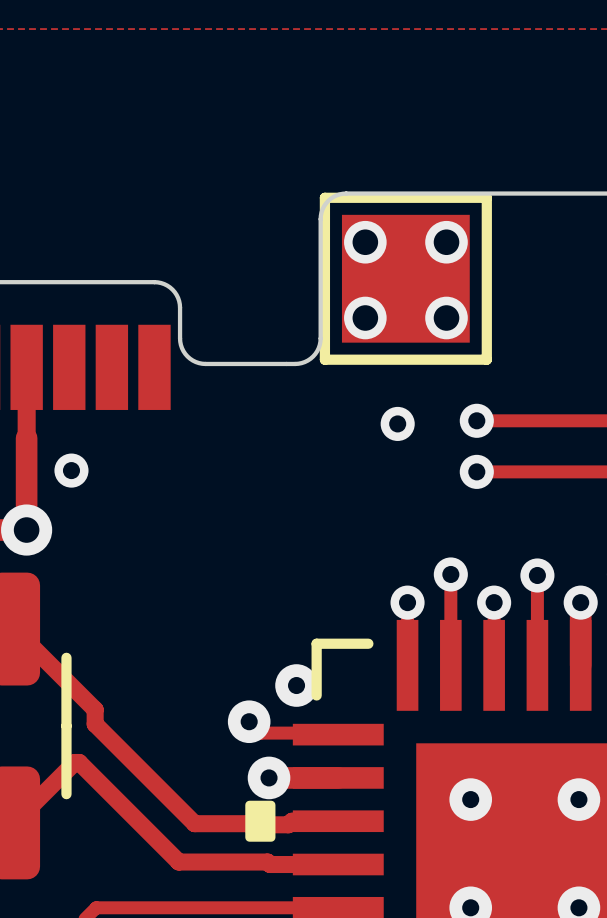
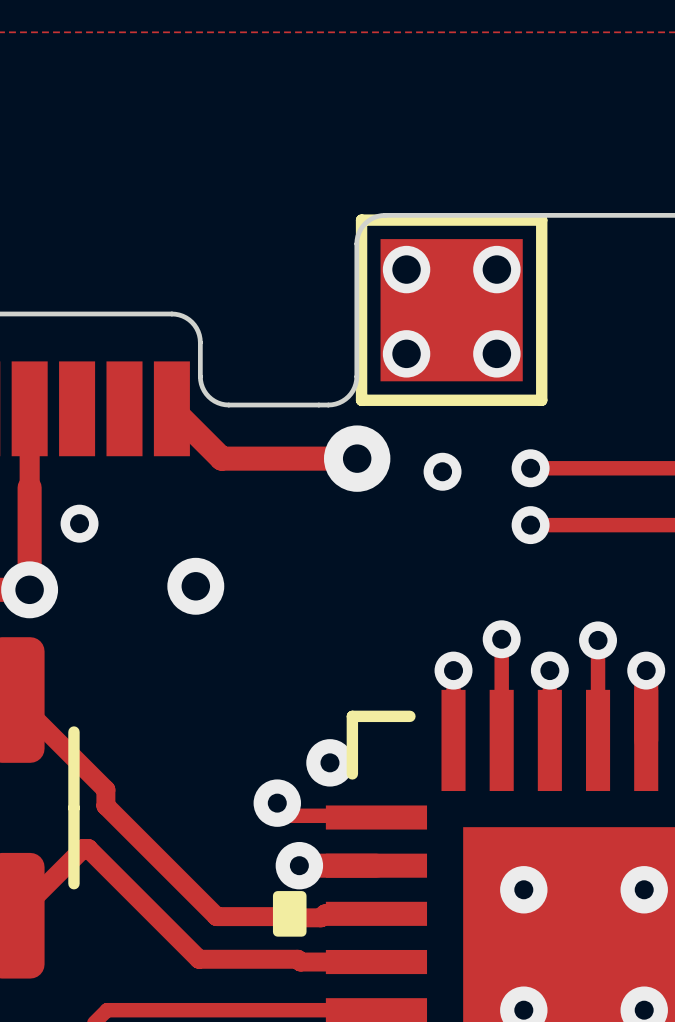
track: none -> (173, 410) (221, 458) (357, 458)
via: none -> (357, 458)
via: none -> (195, 586)

